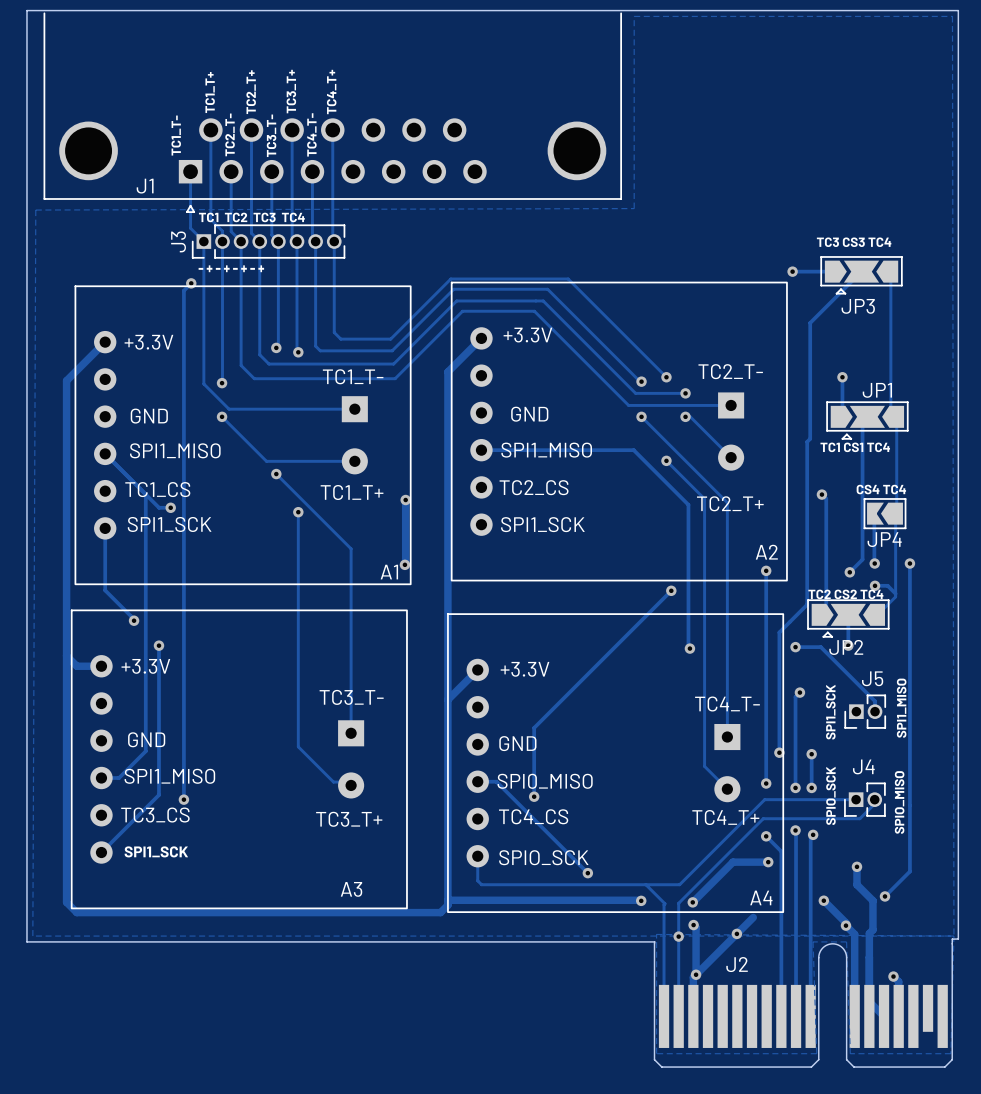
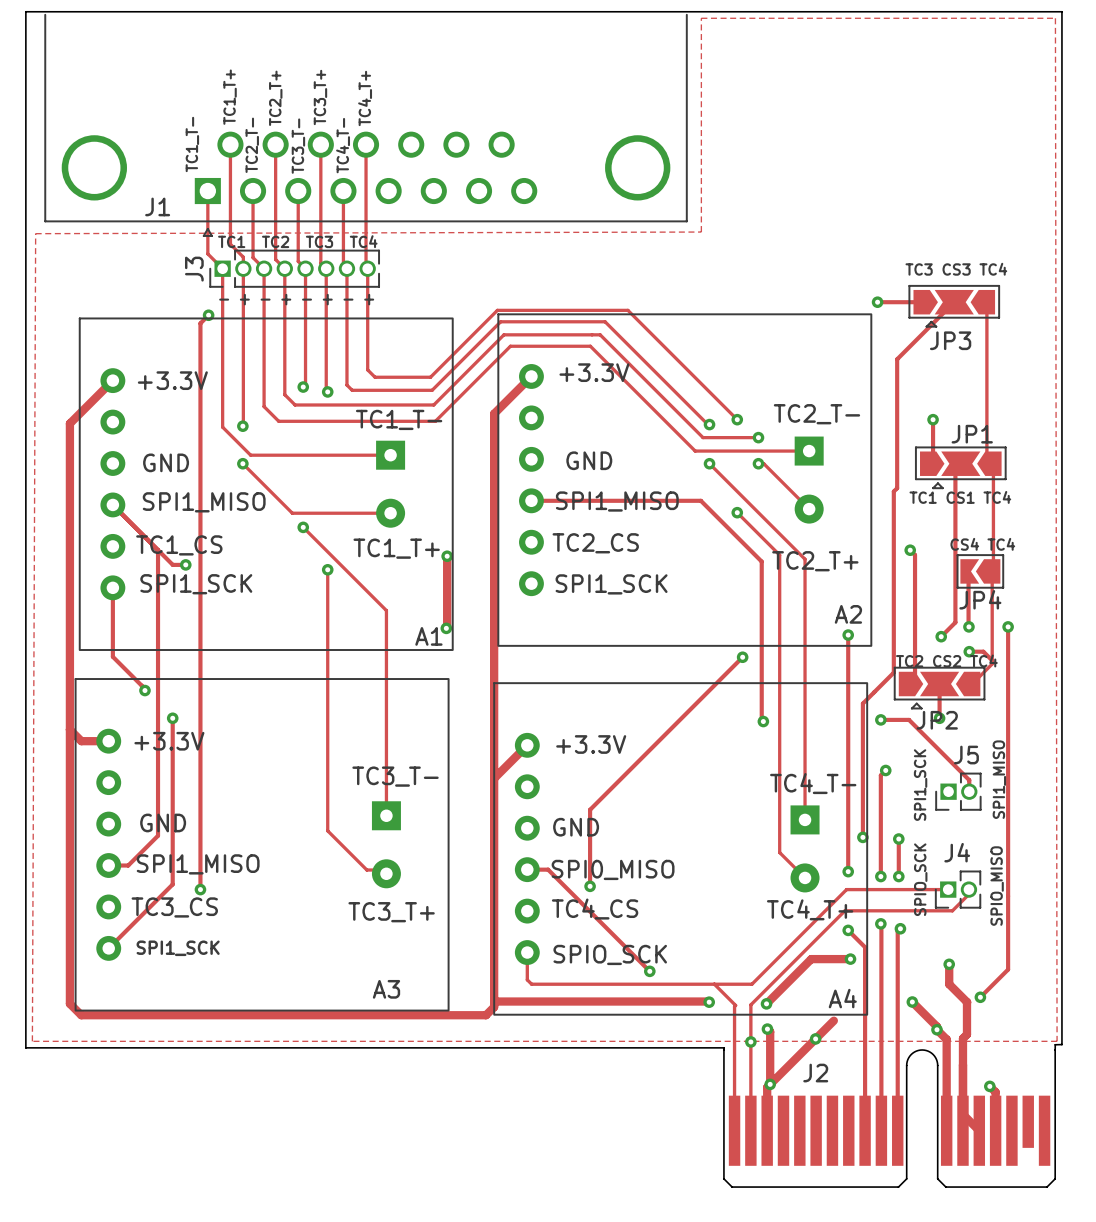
zone outline: (656, 934) (656, 1053) (816, 1053) (813, 941) (846, 941) (850, 1053) (950, 1053) (953, 936) (656, 934) -> none

